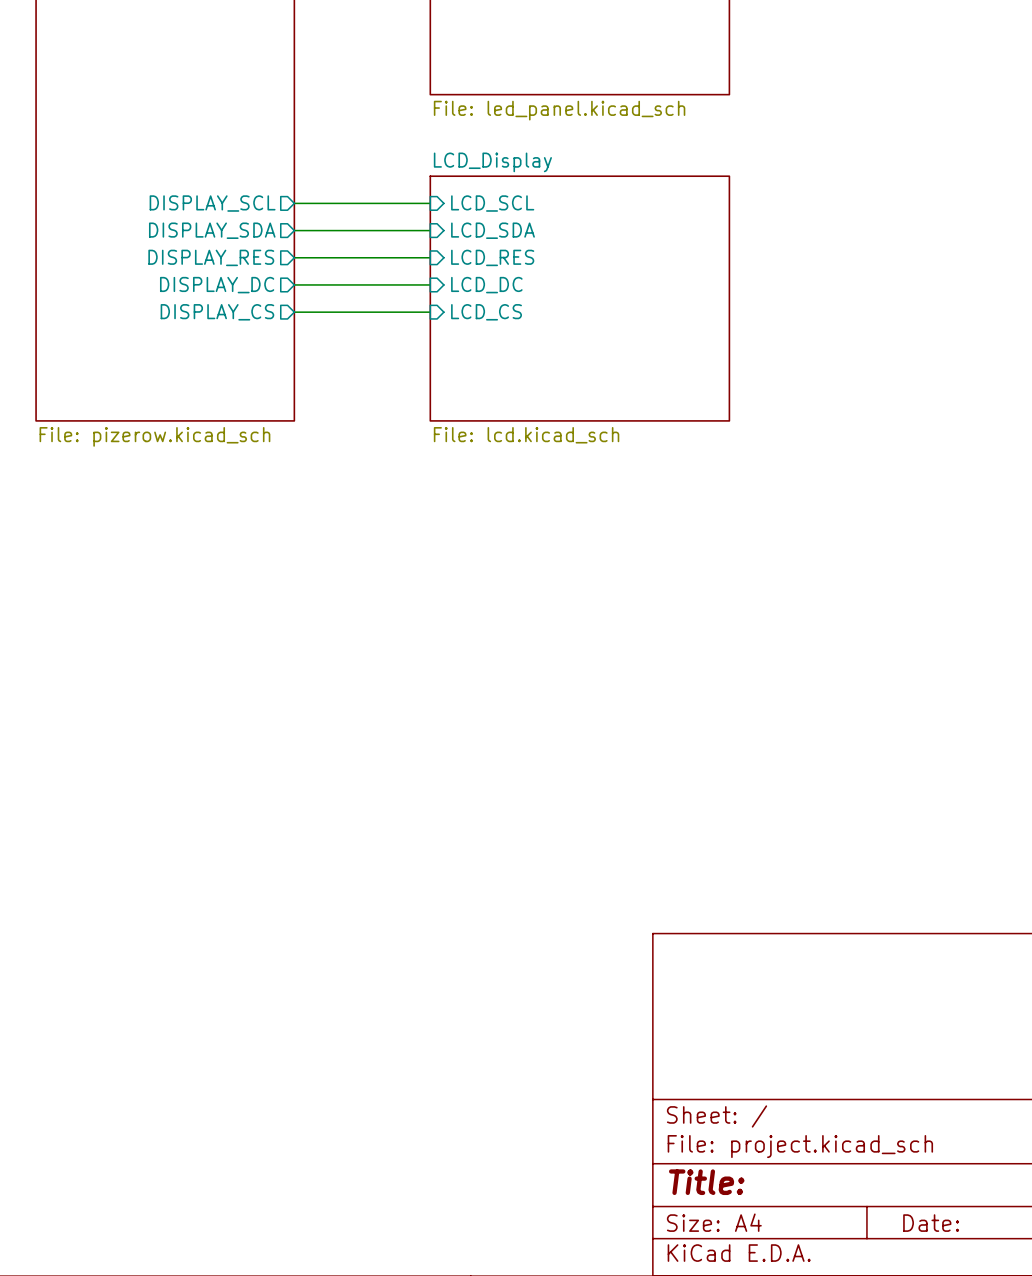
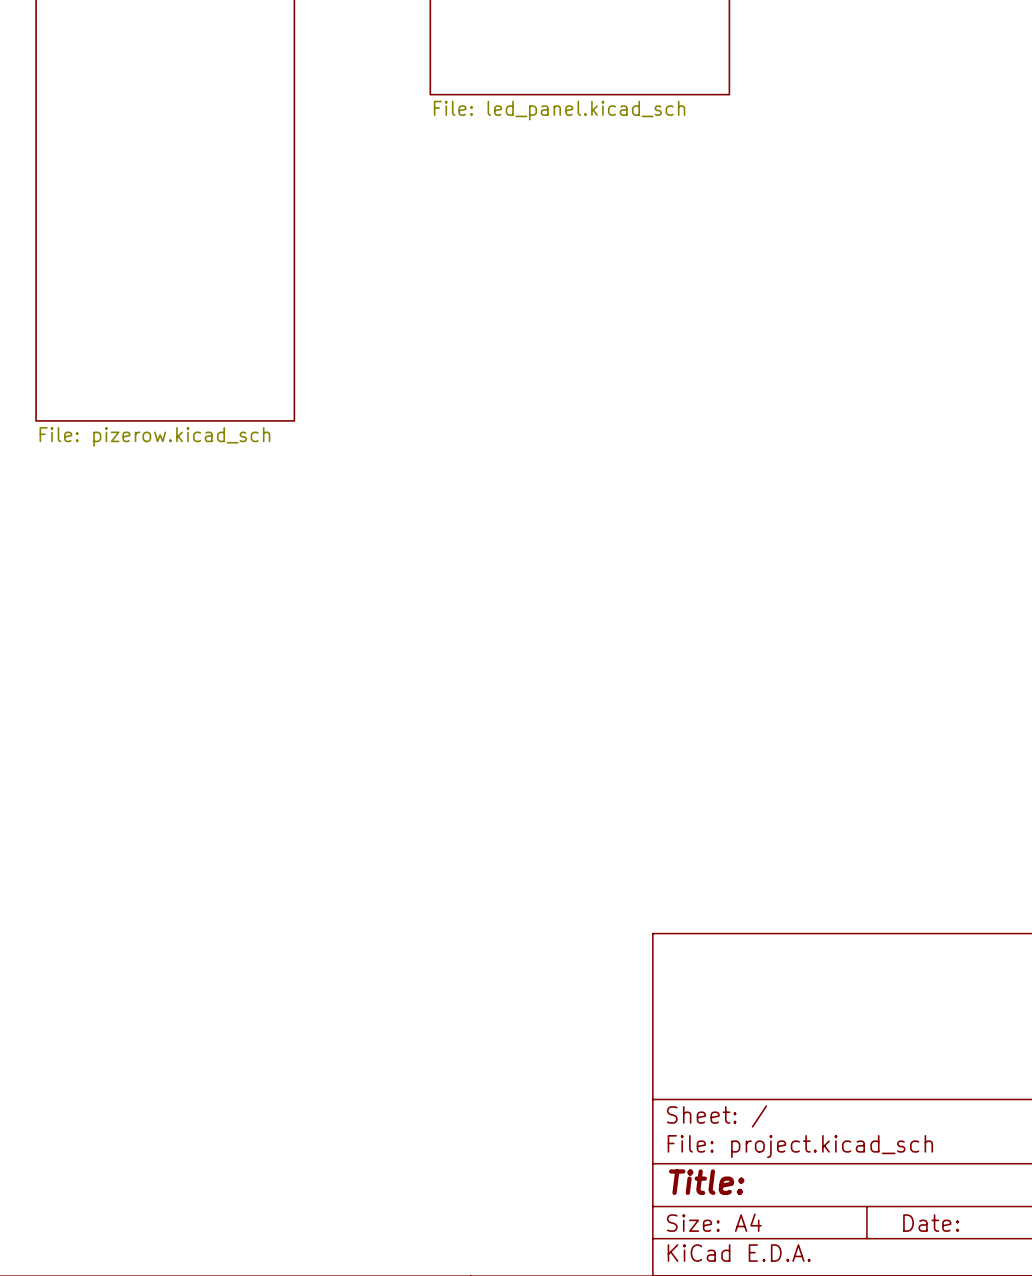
sheet pin: DISPLAY_SCL (212, 203) -> none
wire: (294, 203) (430, 203) -> none
sheet pin: LCD_SCL (492, 203) -> none
sheet pin: DISPLAY_SDA (212, 230) -> none
wire: (294, 230) (430, 230) -> none
sheet pin: LCD_SDA (492, 230) -> none
sheet pin: DISPLAY_RES (211, 257) -> none
wire: (294, 257) (430, 257) -> none
sheet pin: LCD_RES (492, 257) -> none
wire: (294, 284) (430, 284) -> none
sheet pin: DISPLAY_DC (217, 285) -> none
sheet pin: LCD_DC (486, 285) -> none
sheet LCD_Display: File: lcd.kicad_sch (579, 298) -> none
sheet pin: DISPLAY_CS (217, 312) -> none
wire: (294, 312) (430, 312) -> none
sheet pin: LCD_CS (486, 312) -> none

